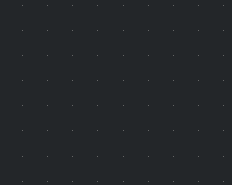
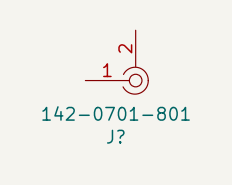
J?: none -> 142-0701-801 (116, 62)

